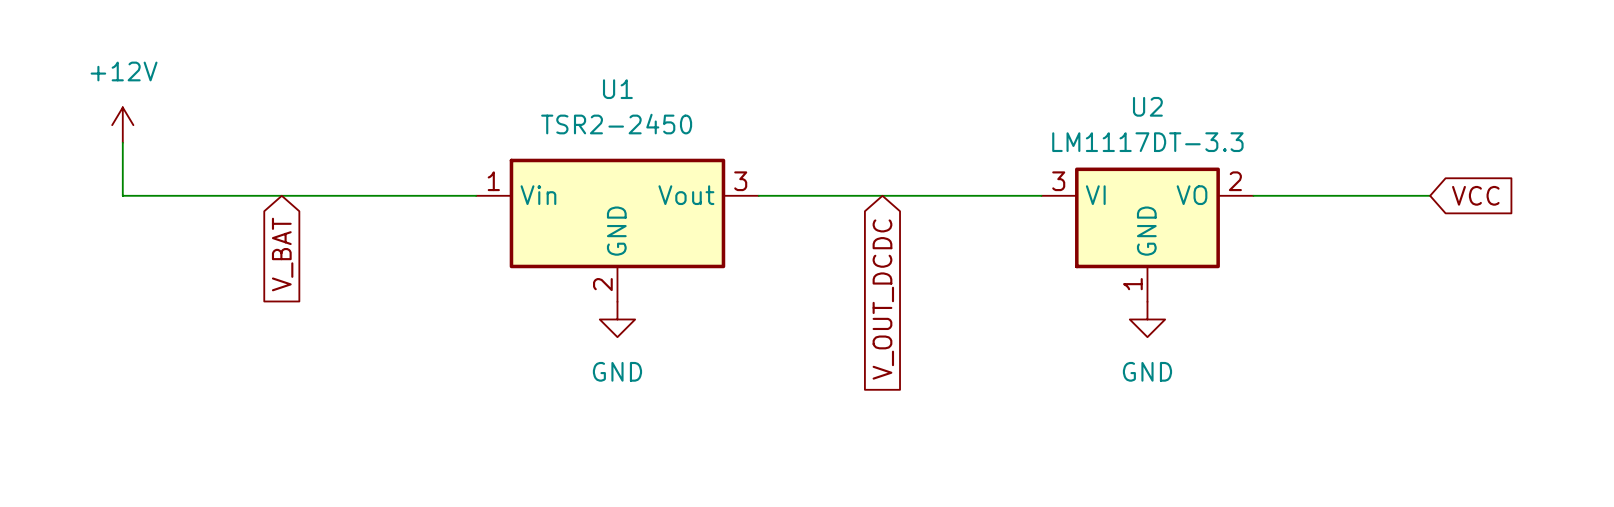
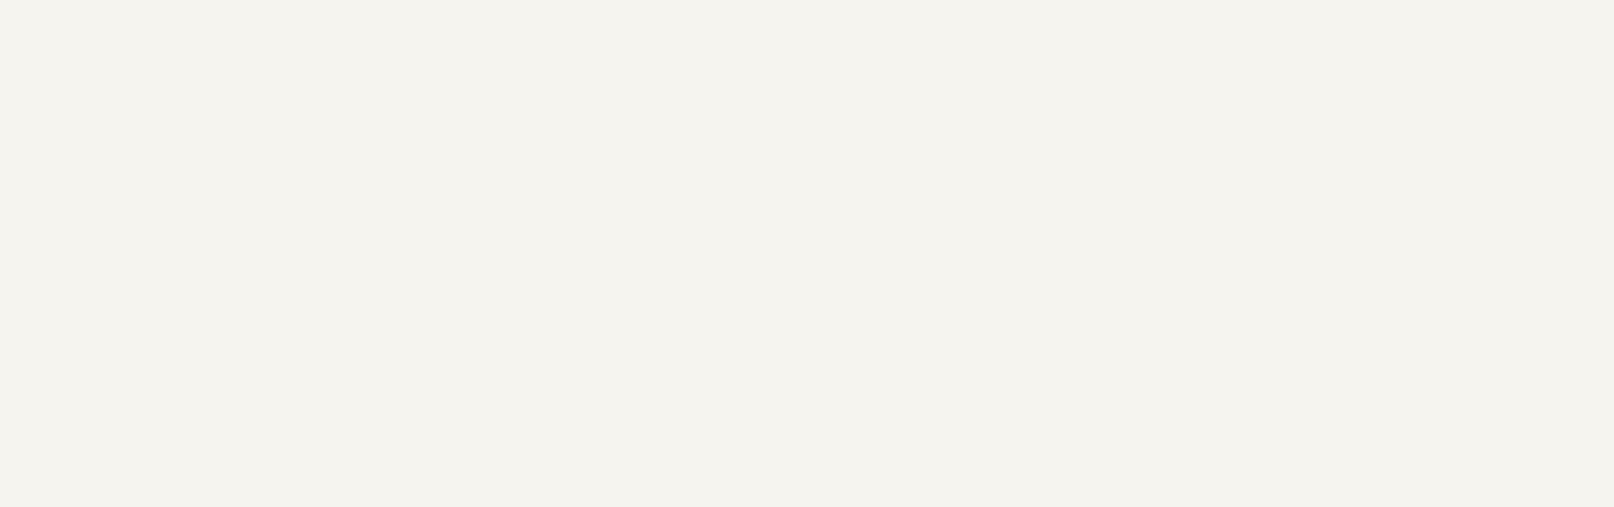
power symbol: +12V (122, 125) -> none
wire: (122, 142) (122, 195) (476, 195) -> none
wire: (758, 195) (1041, 195) -> none
wire: (1253, 195) (1430, 195) -> none
global label: VCC (1475, 195) -> none
U1: TSR2-2450 (617, 230) -> none
U2: LM1117DT-3.3 (1147, 234) -> none
global label: V_BAT (282, 254) -> none
global label: V_OUT_DCDC (883, 299) -> none
power symbol: GND (617, 319) -> none
power symbol: GND (1147, 319) -> none

